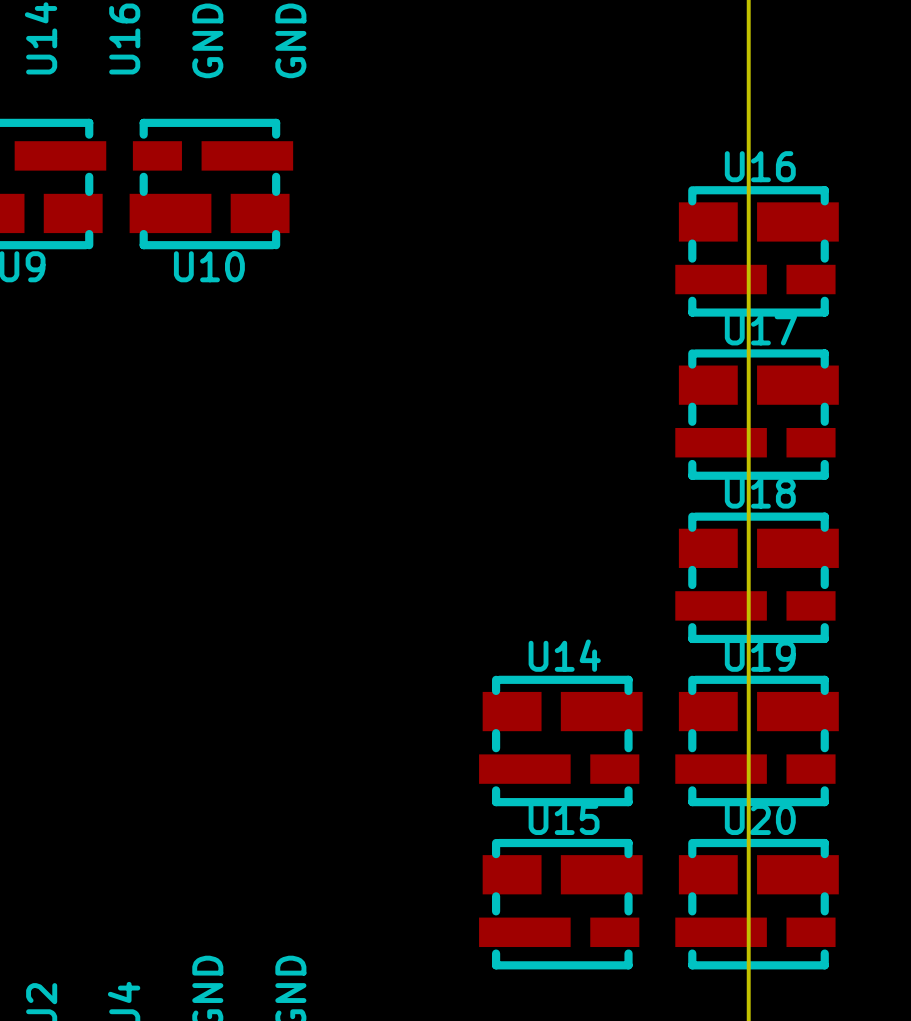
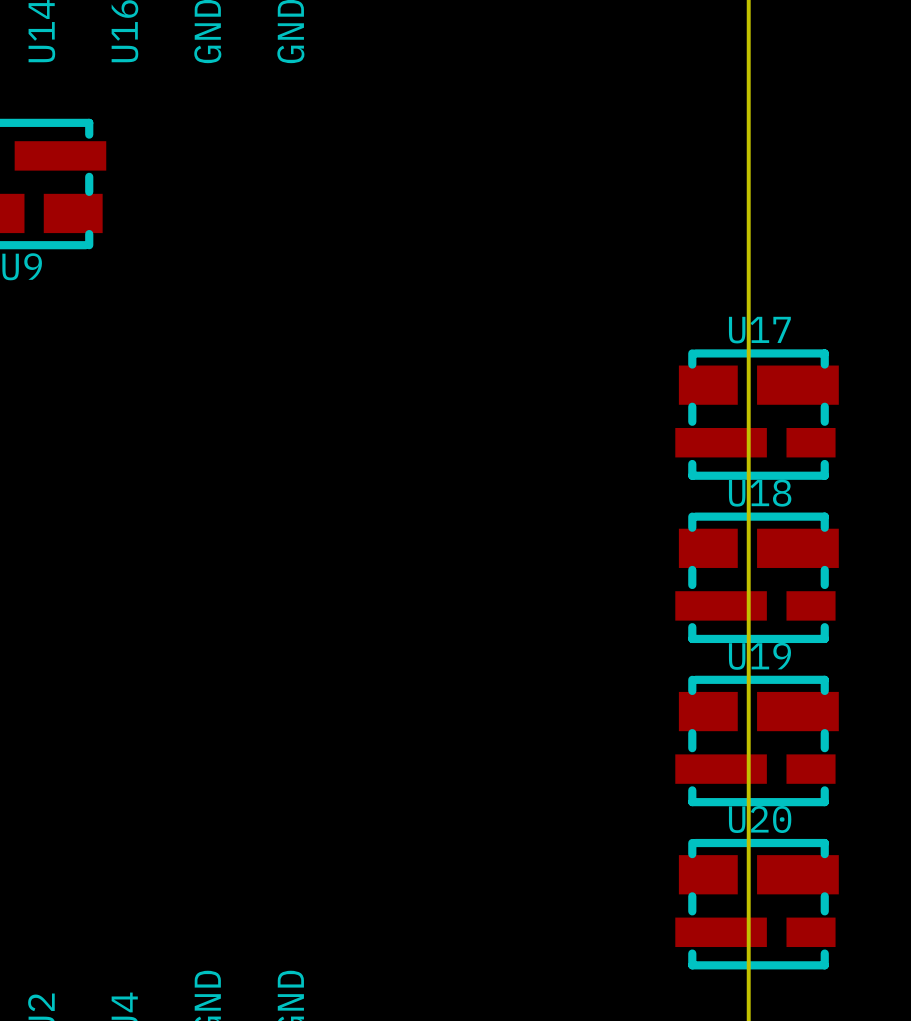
U10: (211, 184) -> none
U16: (757, 251) -> none
U14: (560, 740) -> none
U15: (560, 904) -> none

